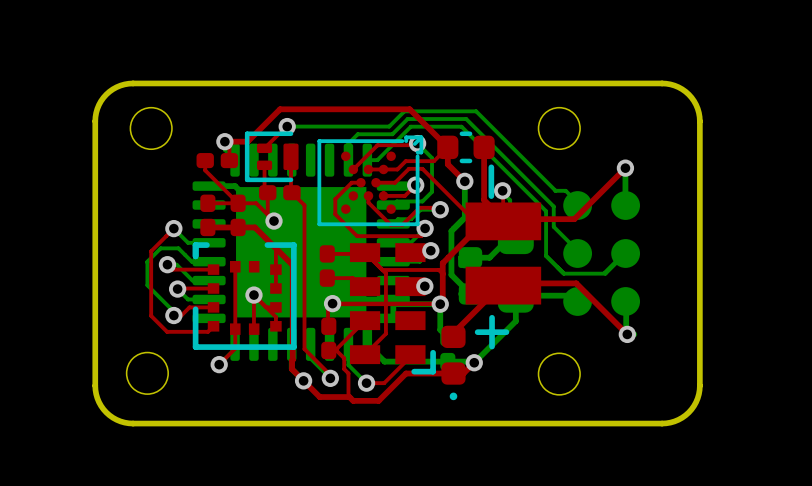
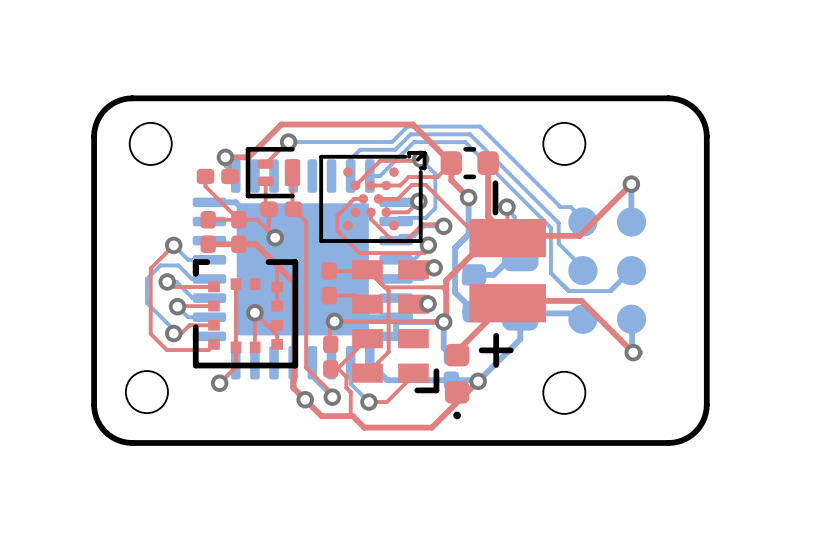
top track: (463, 373) (406, 373) (378, 400) (353, 400) (349, 397) -> (467, 392) (431, 427) (364, 427) (351, 416)

